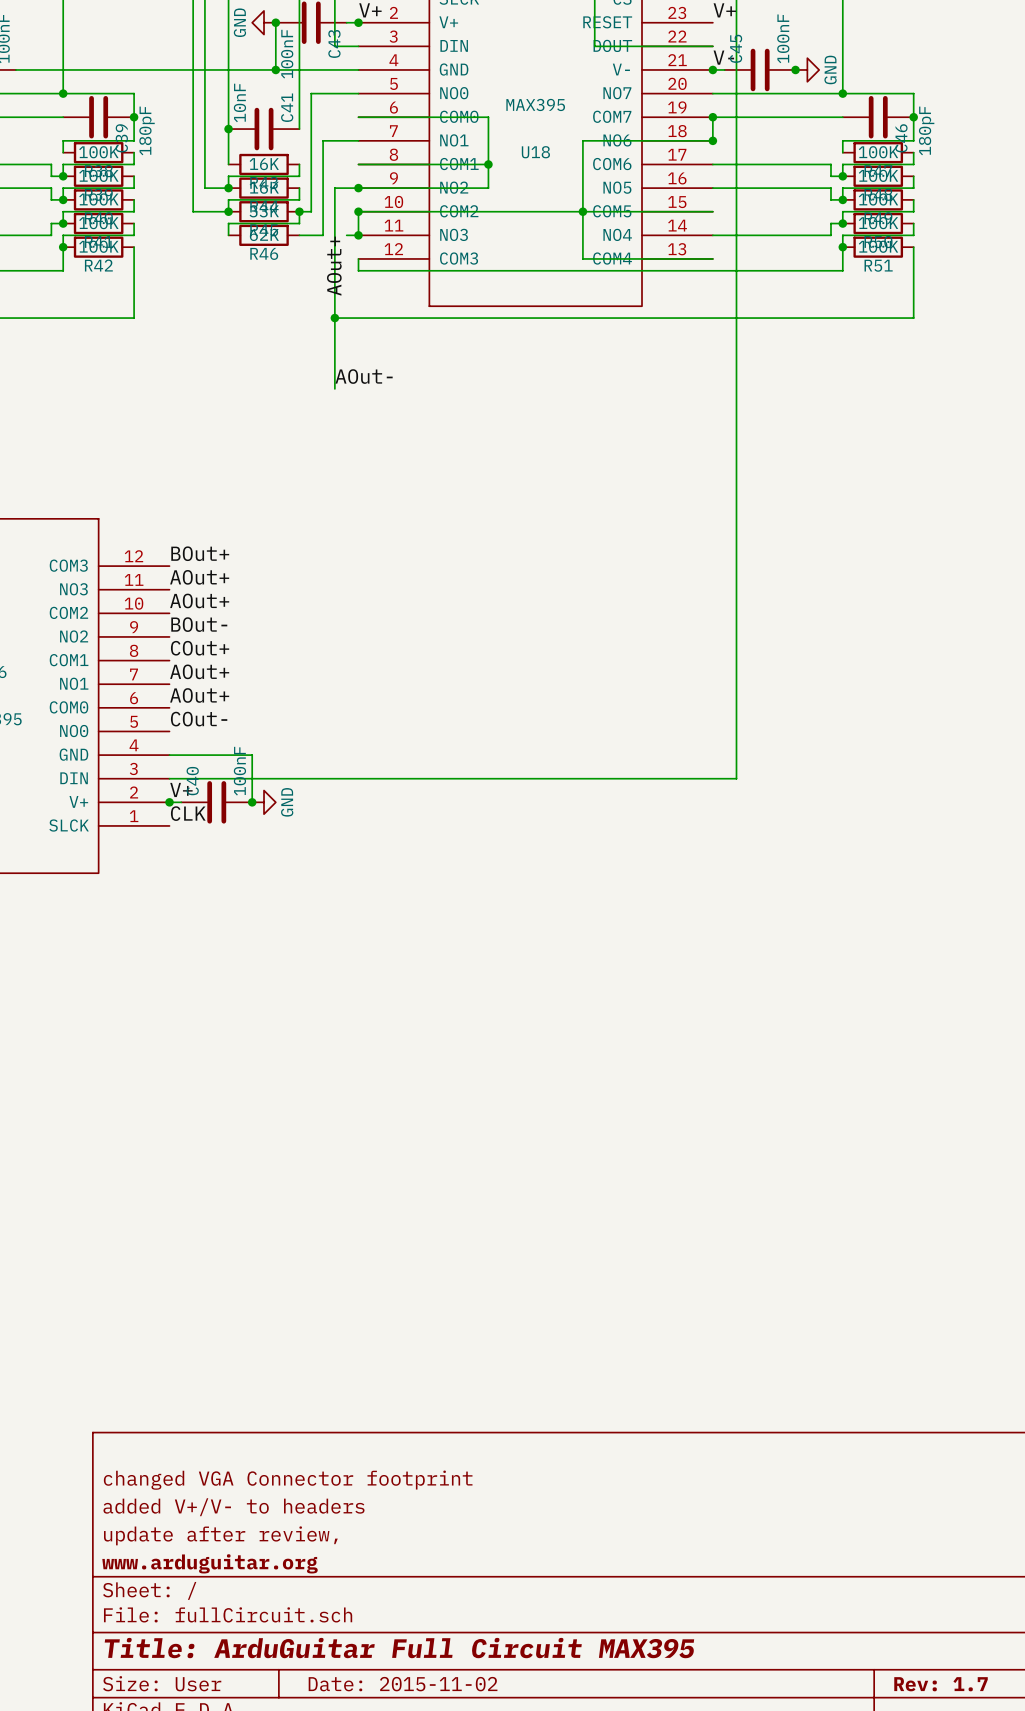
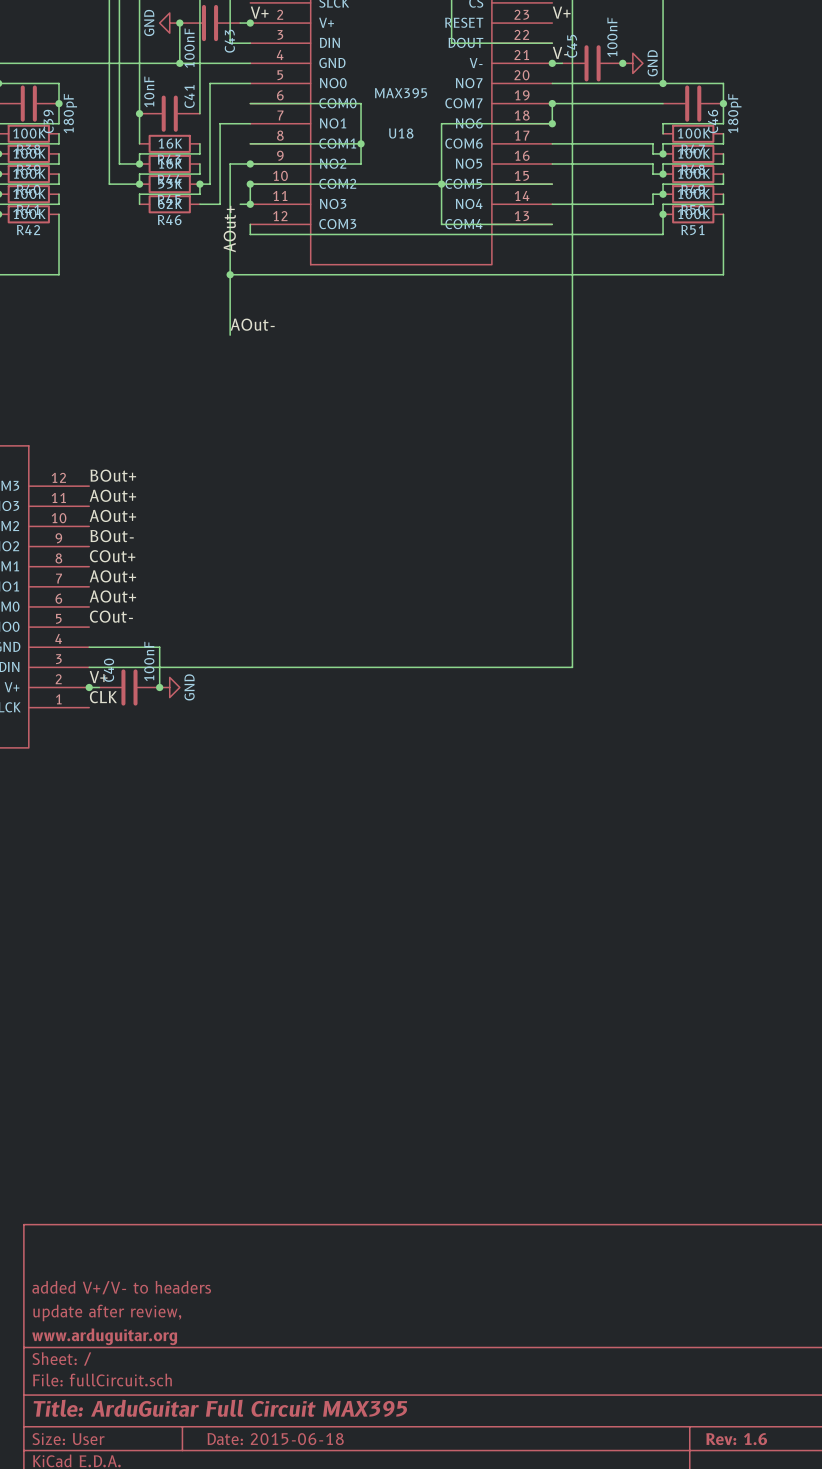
title block: changed VGA Connector footprint (288, 1480) -> none
title block: Date: 2015-11-02 (403, 1684) -> Date: 2015-06-18 (275, 1439)
title block: Rev: 1.7 (941, 1684) -> Rev: 1.6 (736, 1439)

